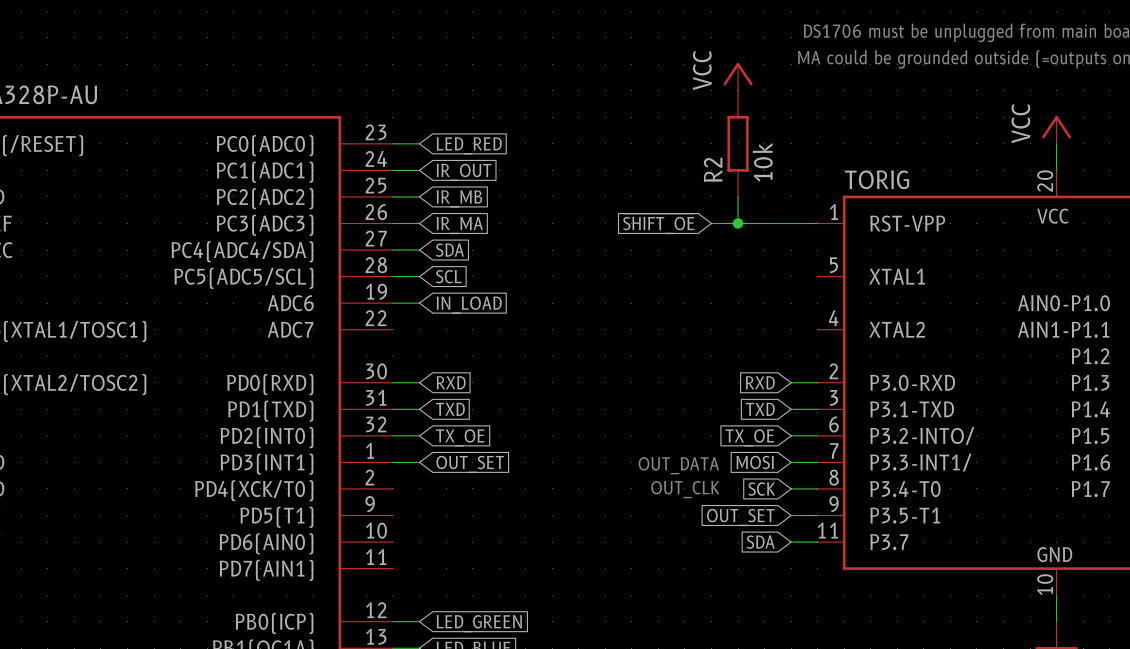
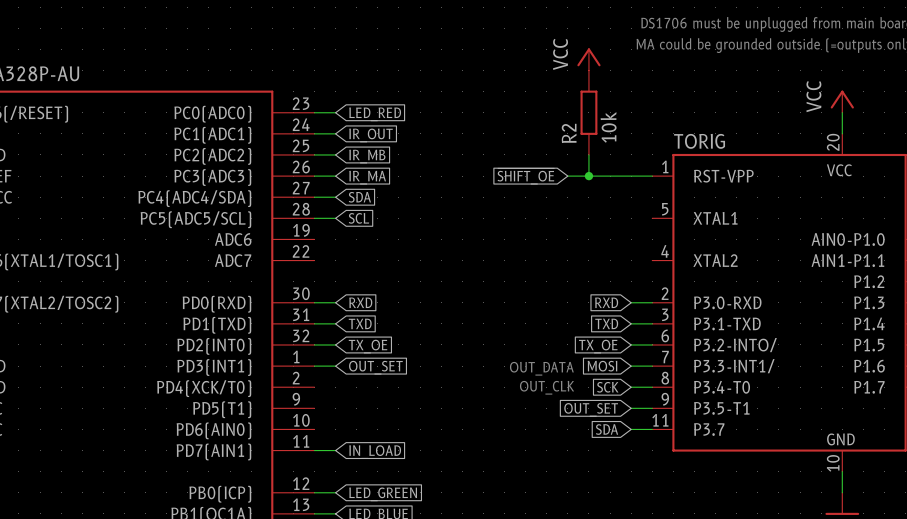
wire: (392, 303) (419, 303) -> none
global label: IN_LOAD (469, 305) -> none
wire: none -> (314, 450) (335, 450)
global label: none -> IN_LOAD (375, 452)

